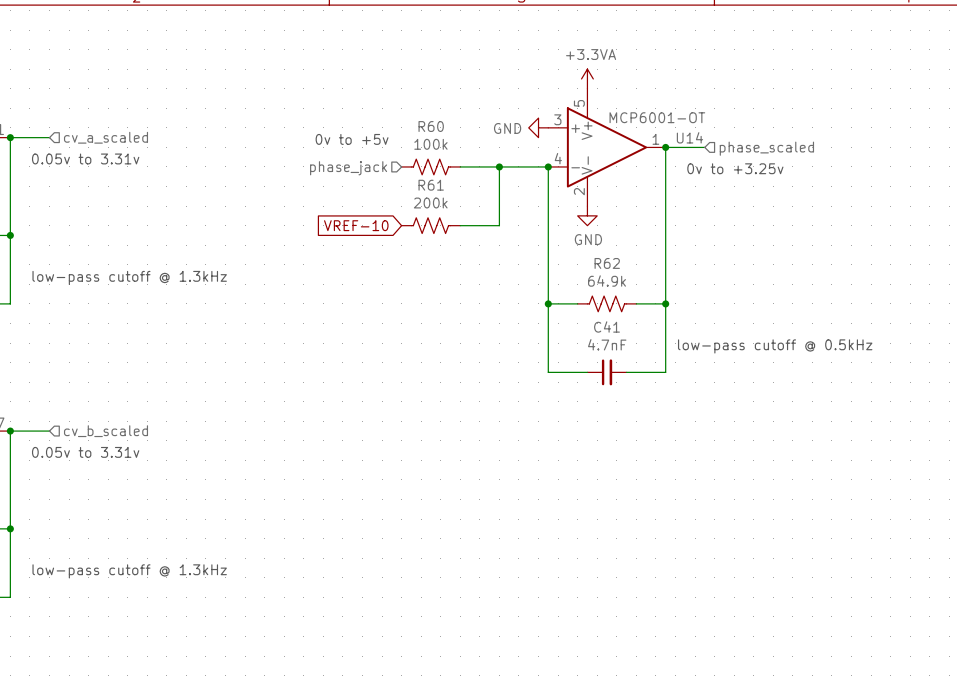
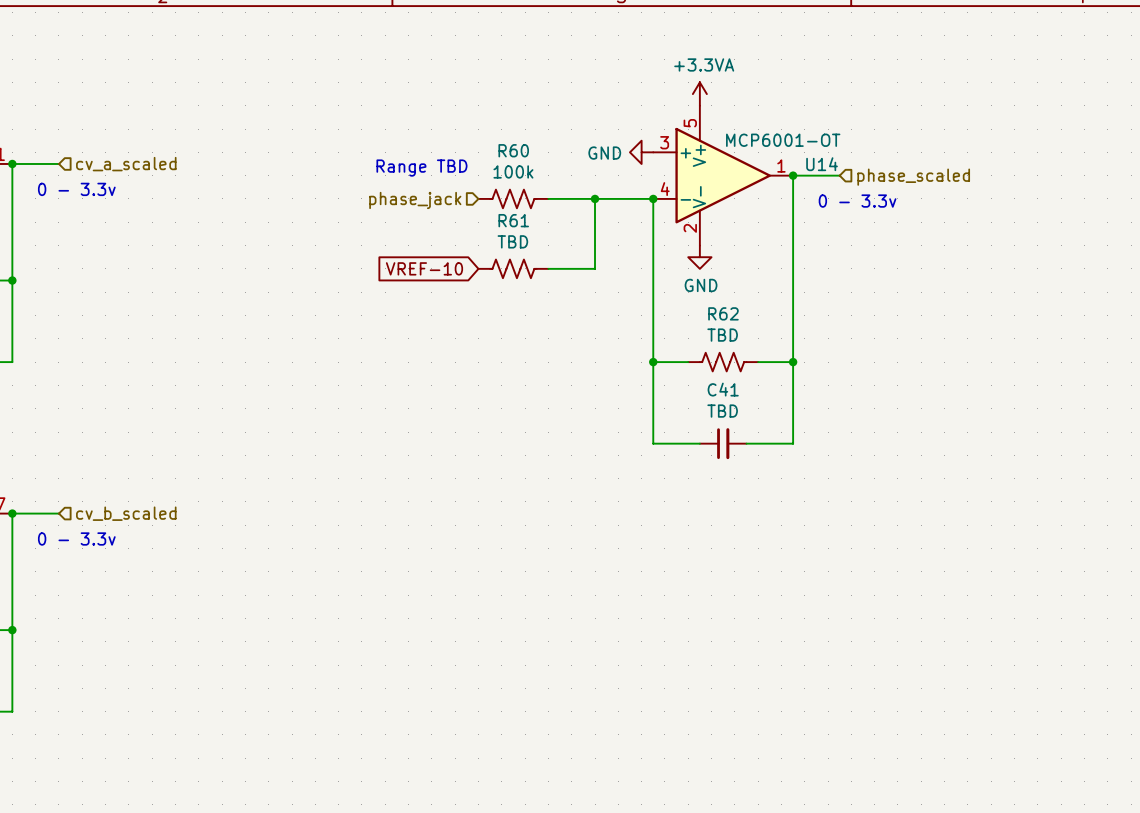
text: 0v to +5v (352, 139) -> Range TBD (421, 168)
text: 0.05v to 3.31v (85, 158) -> 0 - 3.3v (76, 189)
text: 0v to +3.25v (735, 168) -> 0 - 3.3v (857, 201)
R61 value: 200k (430, 203) -> TBD (512, 241)
text: low-pass cutoff @ 1.3kHz (129, 277) -> none
R62 value: 64.9k (606, 281) -> TBD (722, 335)
C41 value: 4.7nF (607, 344) -> TBD (722, 411)
text: low-pass cutoff @ 0.5kHz (775, 346) -> none
text: 0.05v to 3.31v (85, 452) -> 0 - 3.3v (76, 538)
text: low-pass cutoff @ 1.3kHz (129, 571) -> none

